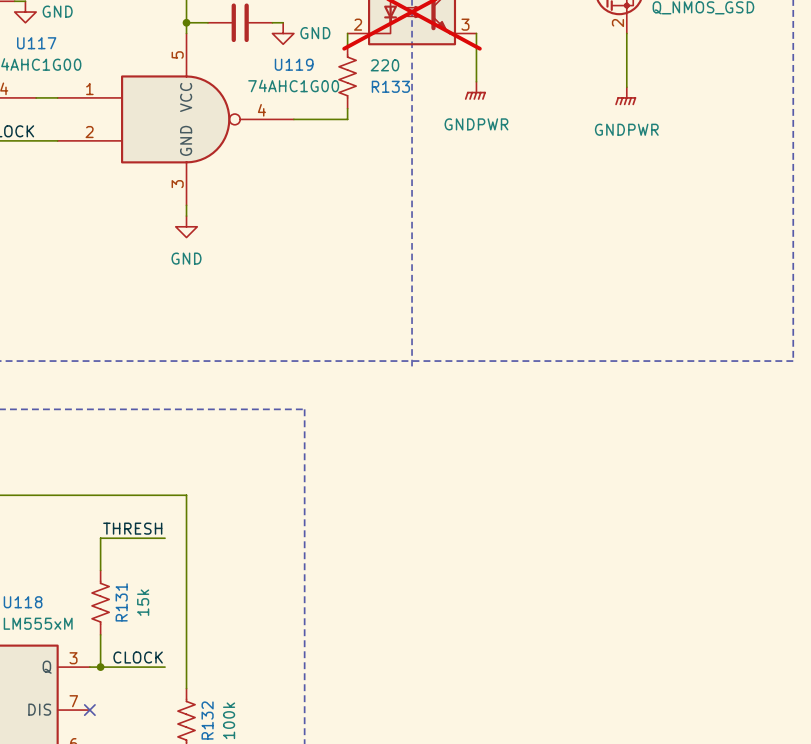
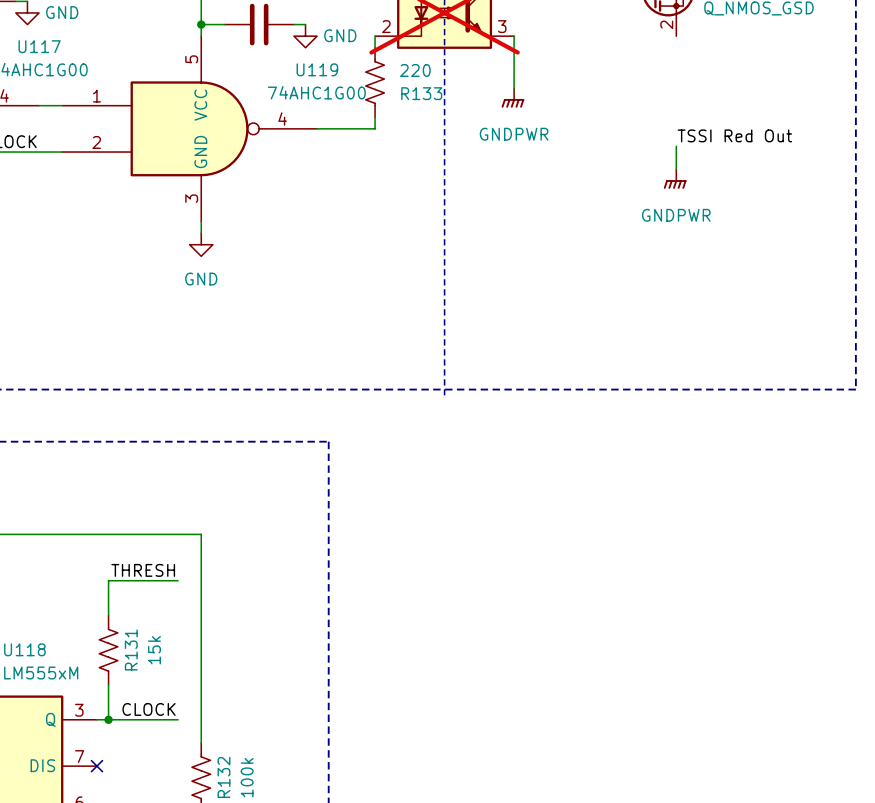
wire: (626, 33) (626, 87) -> none
power symbol position: GNDPWR (625, 96) -> GNDPWR (675, 179)
label: none -> TSSI Red Out (734, 135)
wire: none -> (676, 146) (676, 169)

